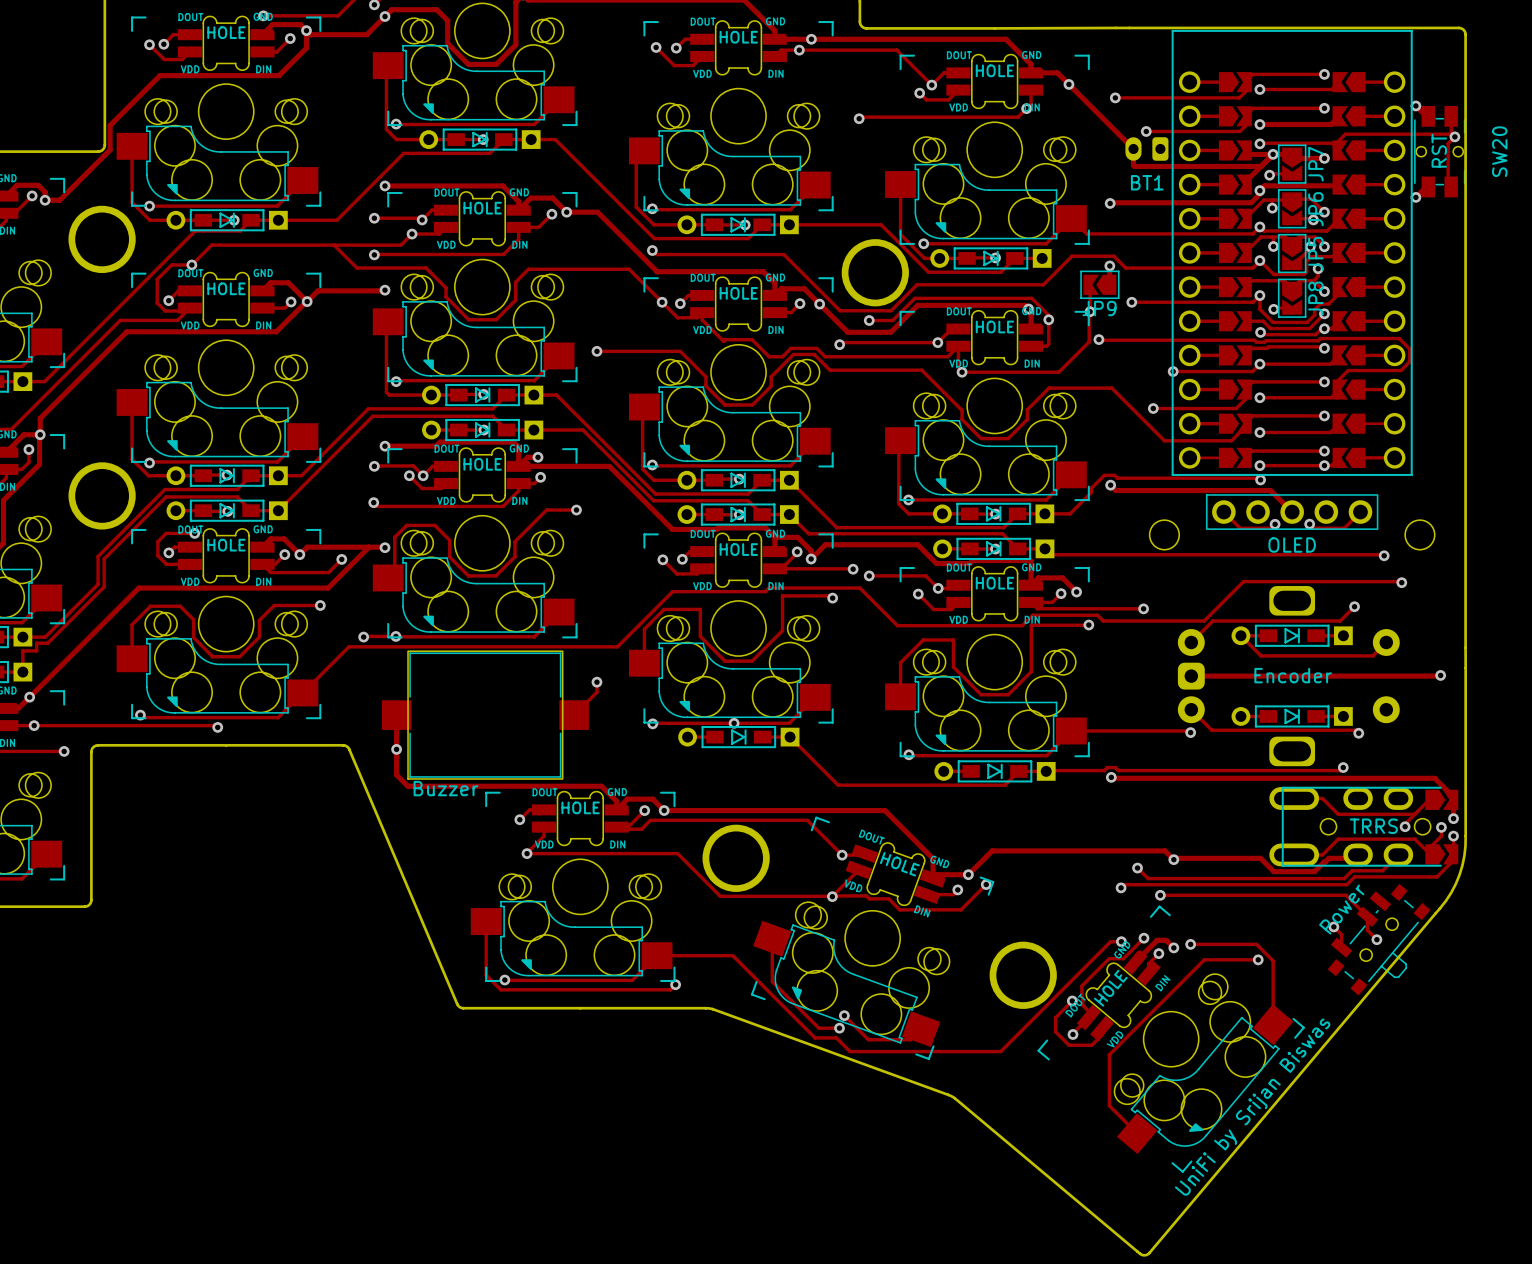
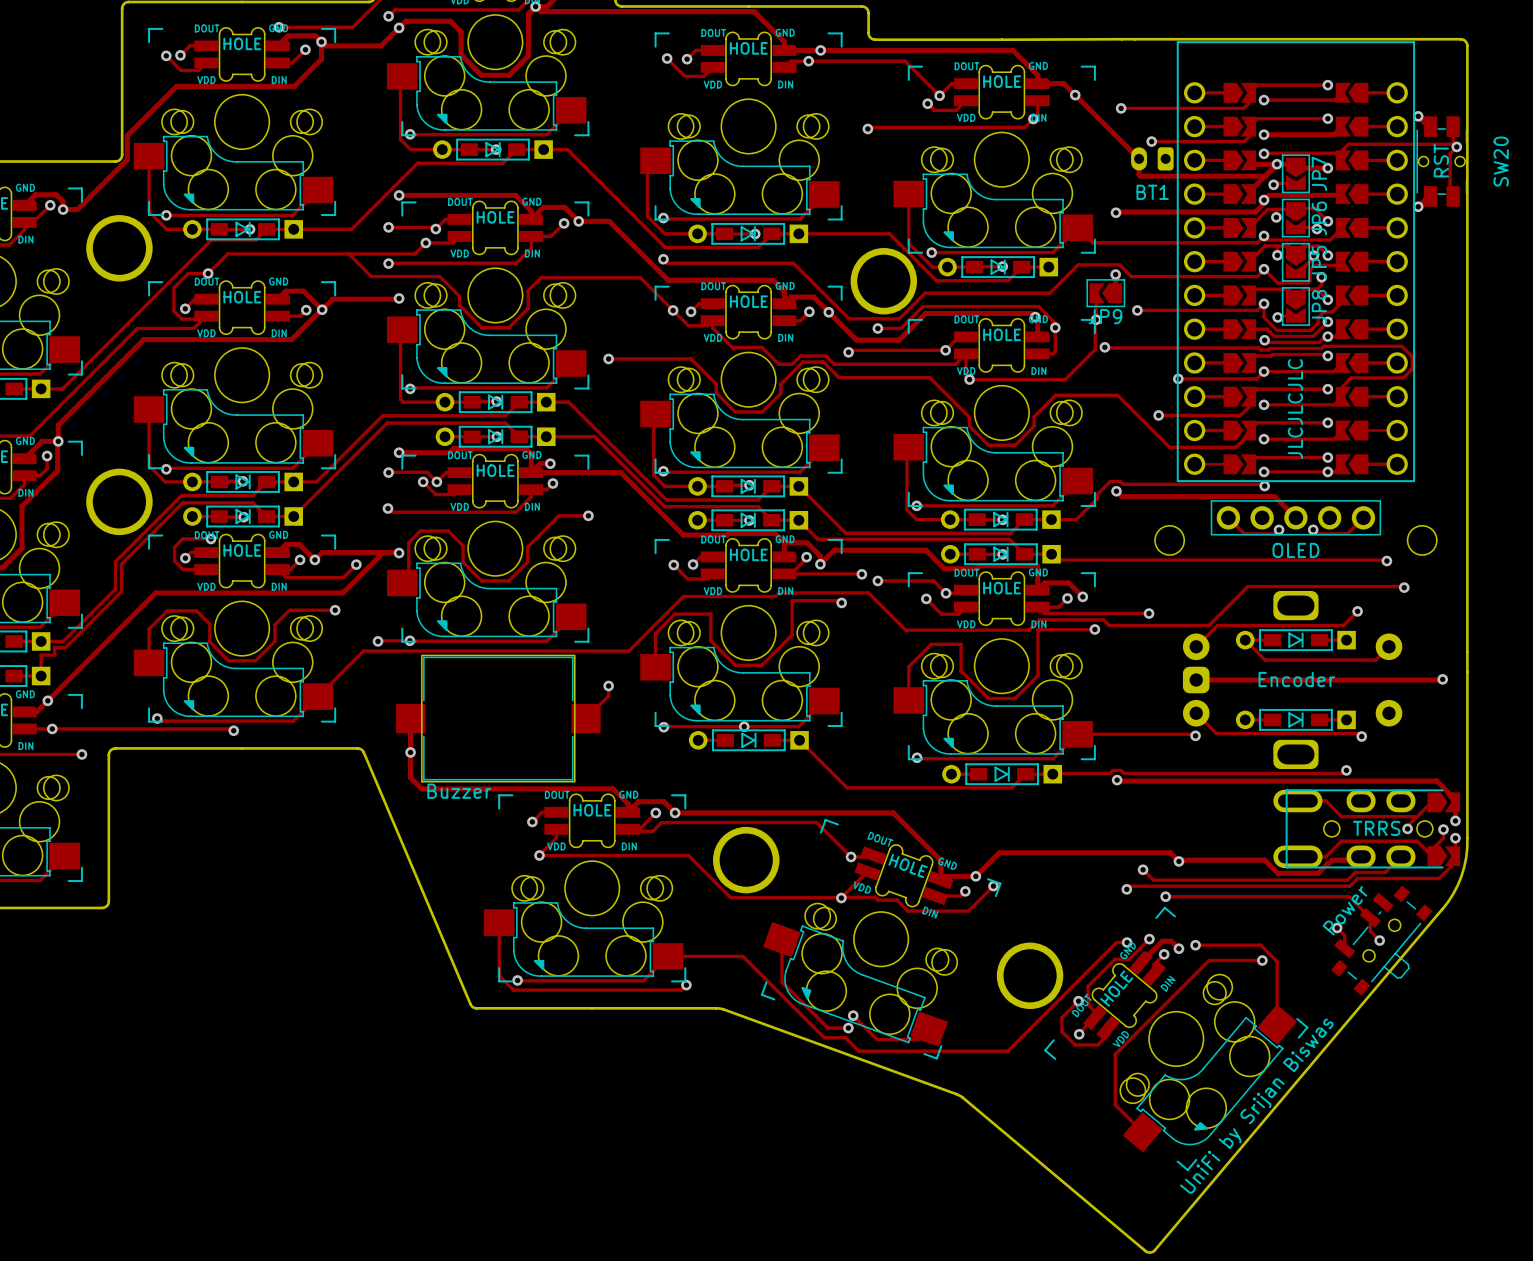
text: none -> JLCJLCJLC (1295, 409)

